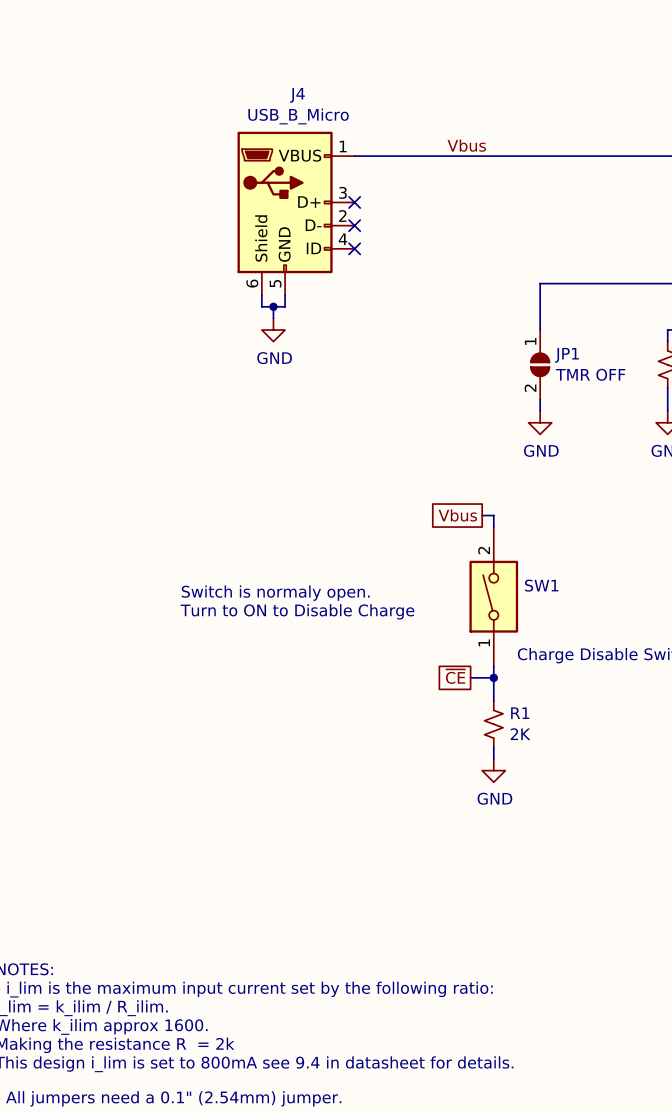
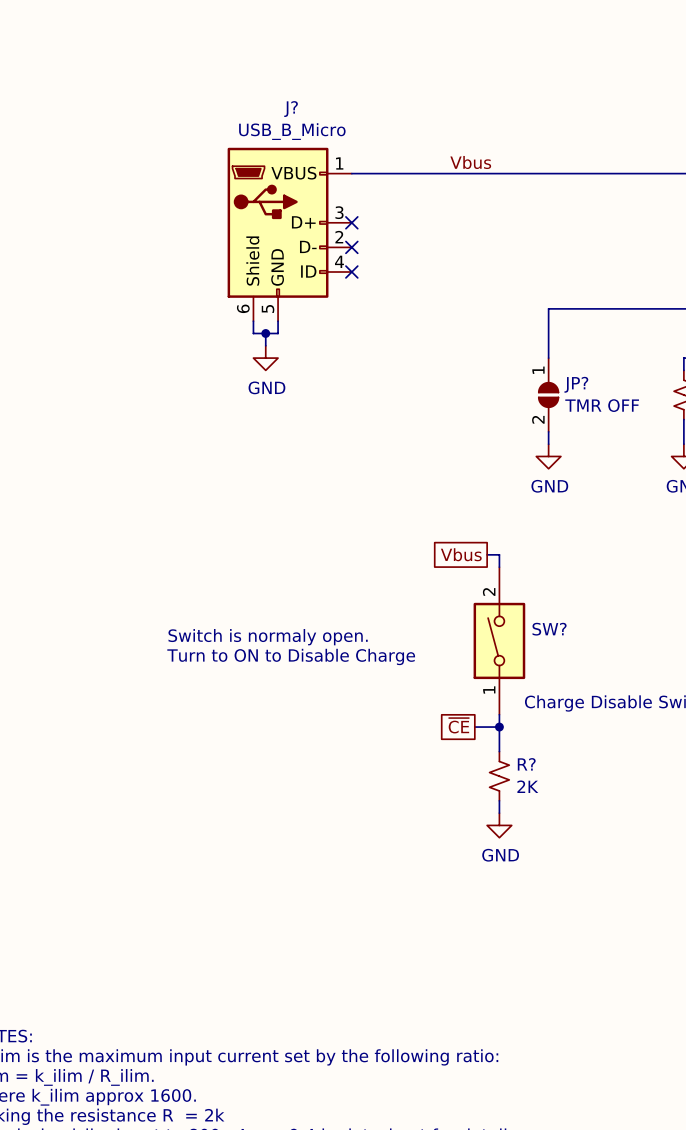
J4 name: J4 (297, 95) -> J? (291, 109)
JP1 name: JP1 (566, 355) -> JP? (576, 384)
SW1 name: SW1 (541, 585) -> SW? (549, 629)
R1 name: R1 (520, 713) -> R? (526, 764)

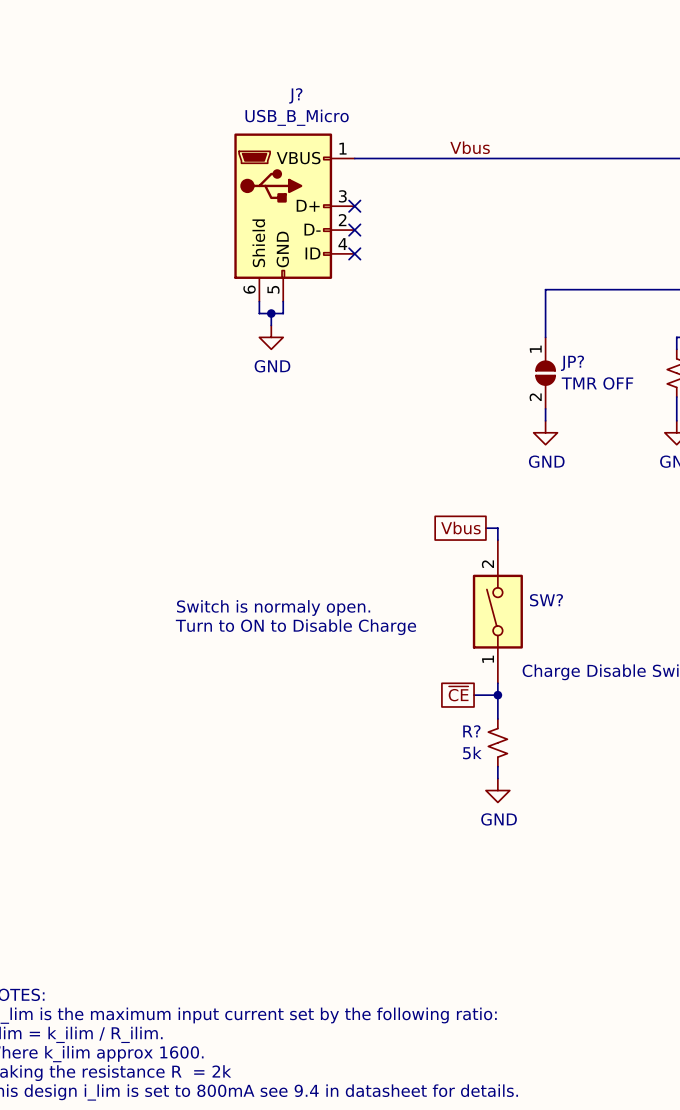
R? flip: as is (499, 776) -> left-right (497, 742)
R? value: 2K (527, 786) -> 5k (472, 752)

